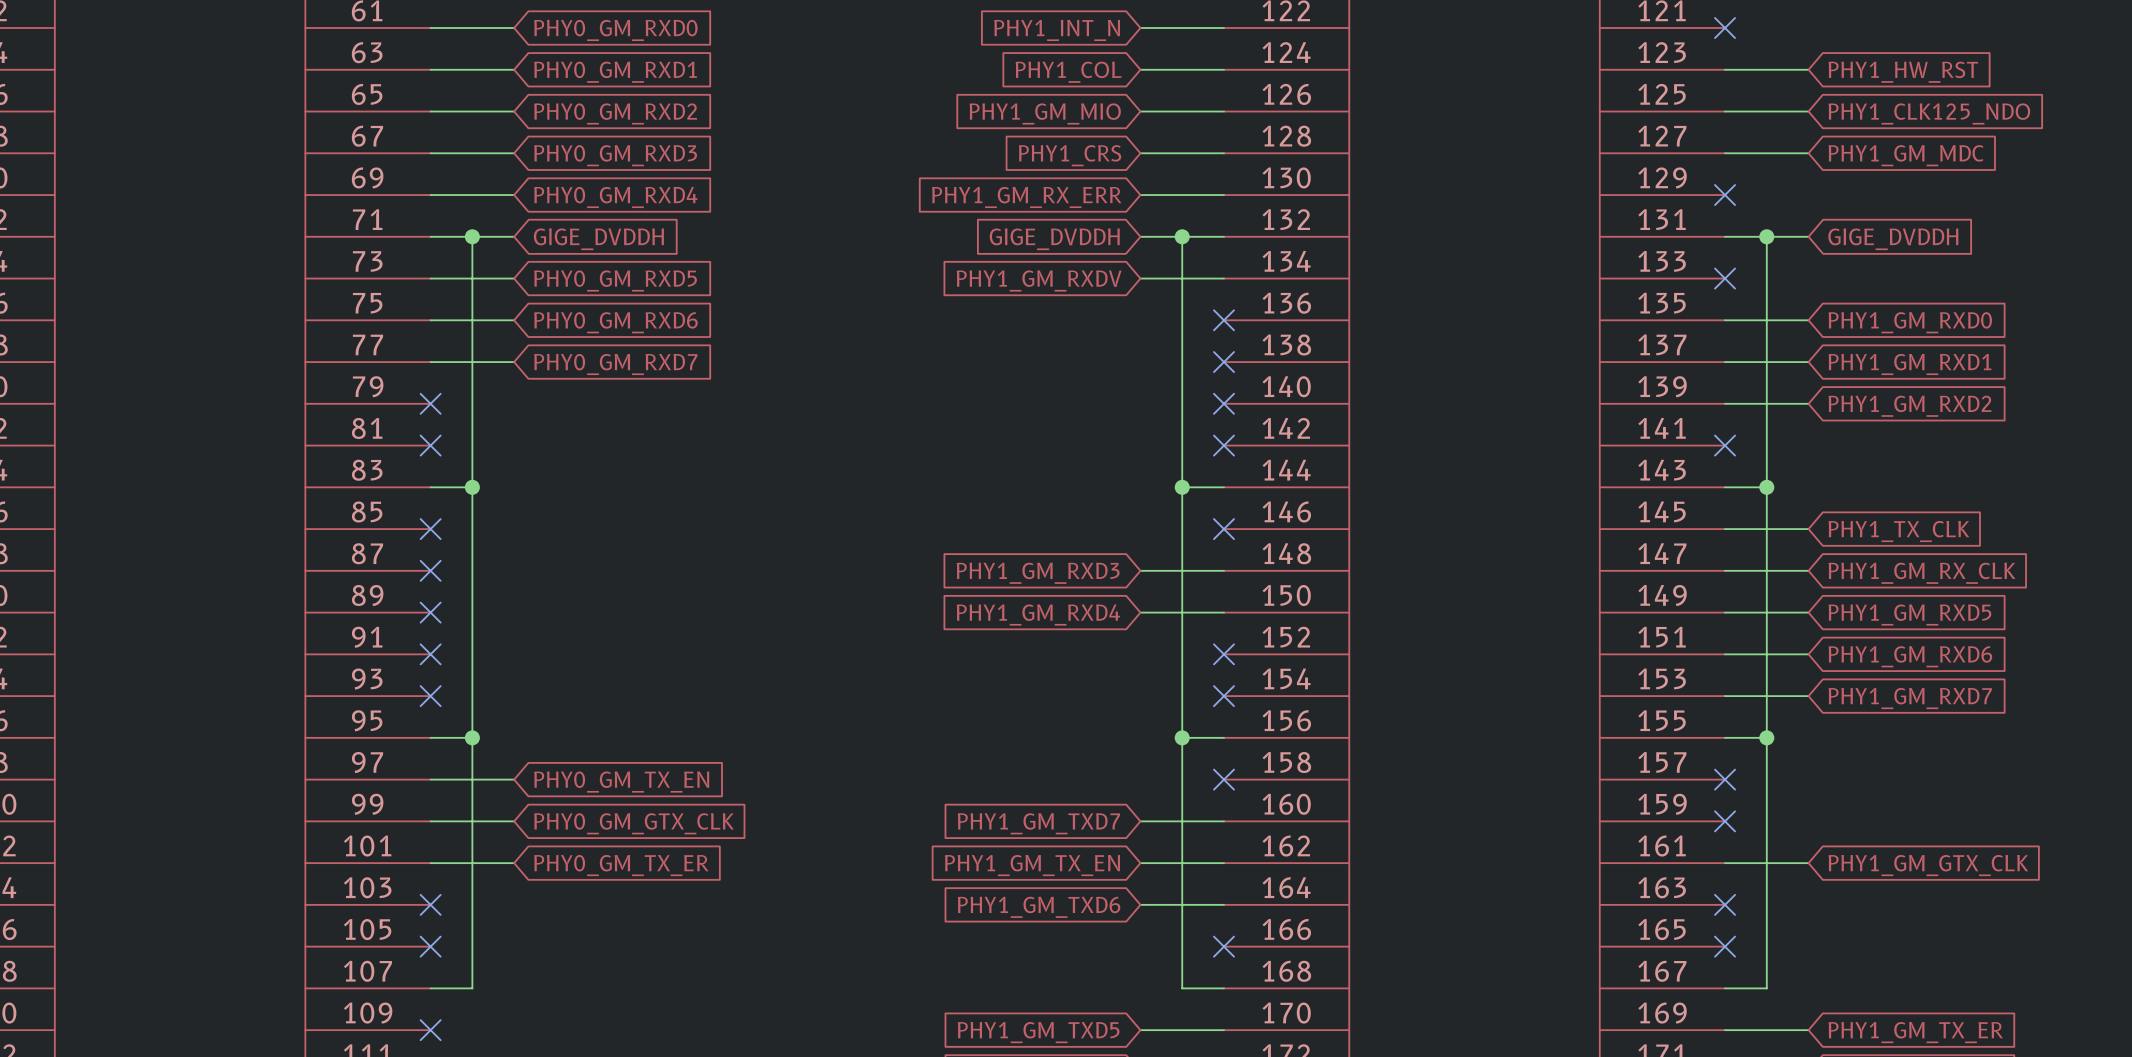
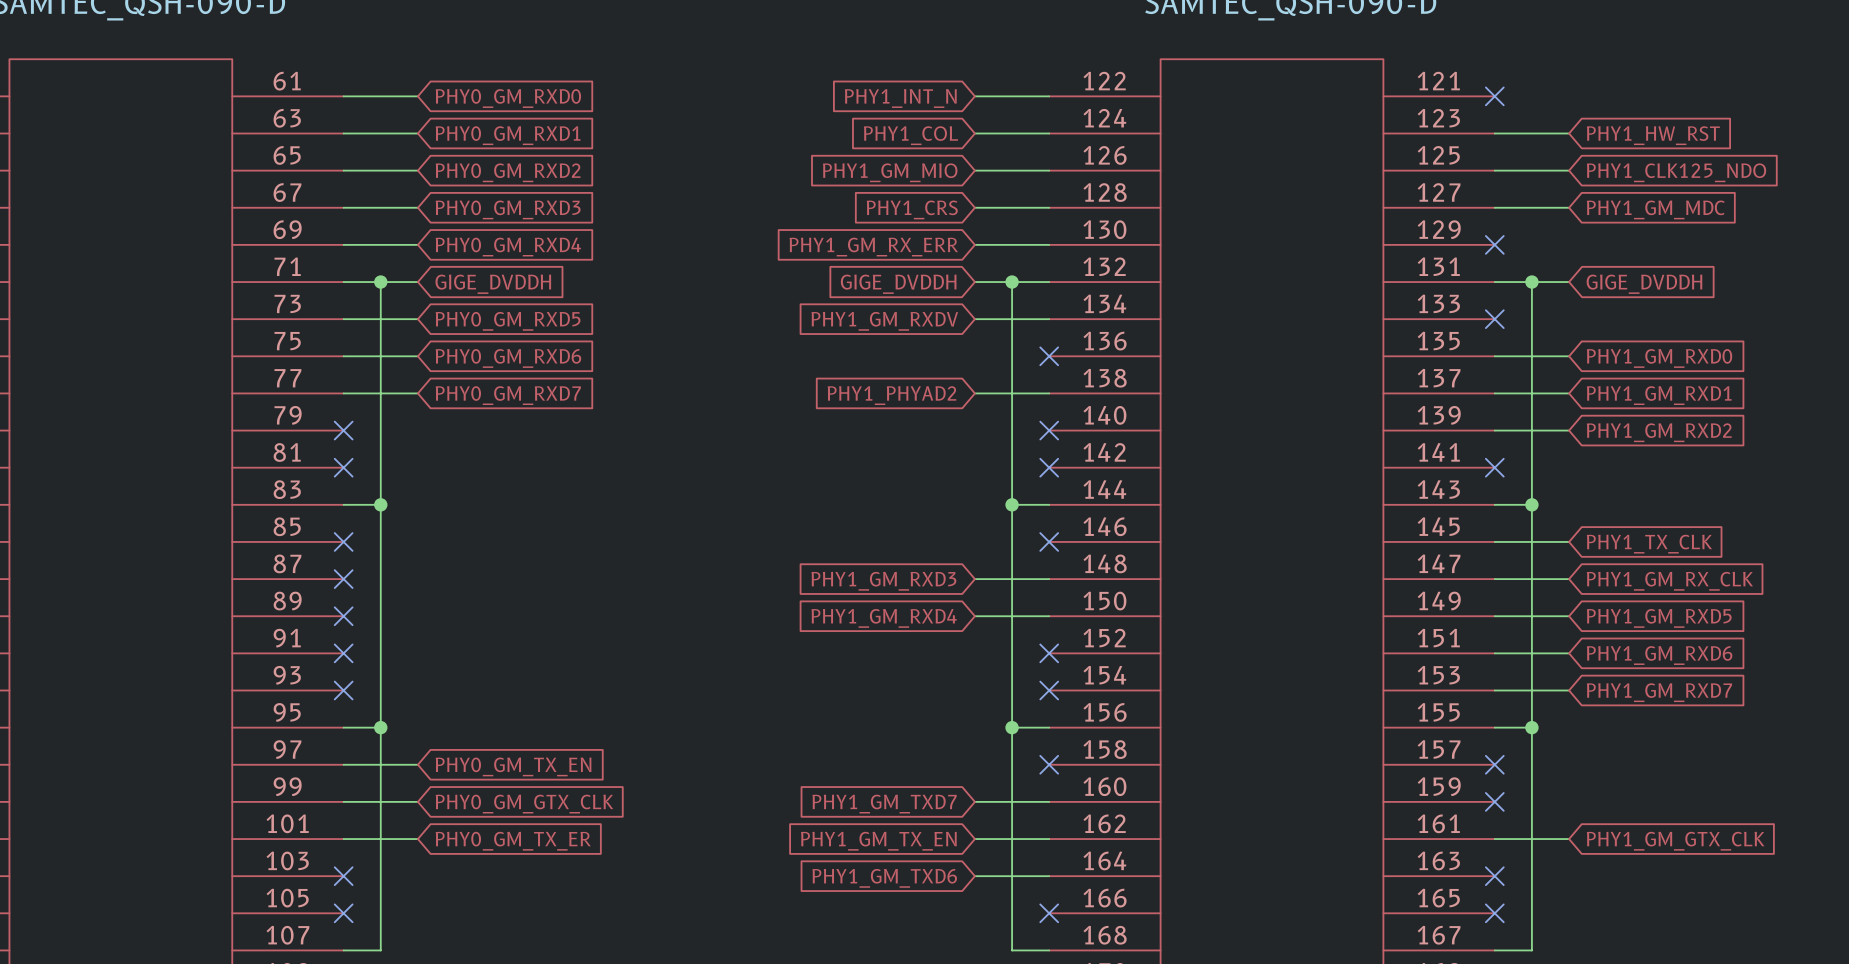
wire: none -> (974, 393) (1049, 393)
no-connect mark: (1223, 362) -> none
global label: none -> PHY1_PHYAD2 (891, 395)

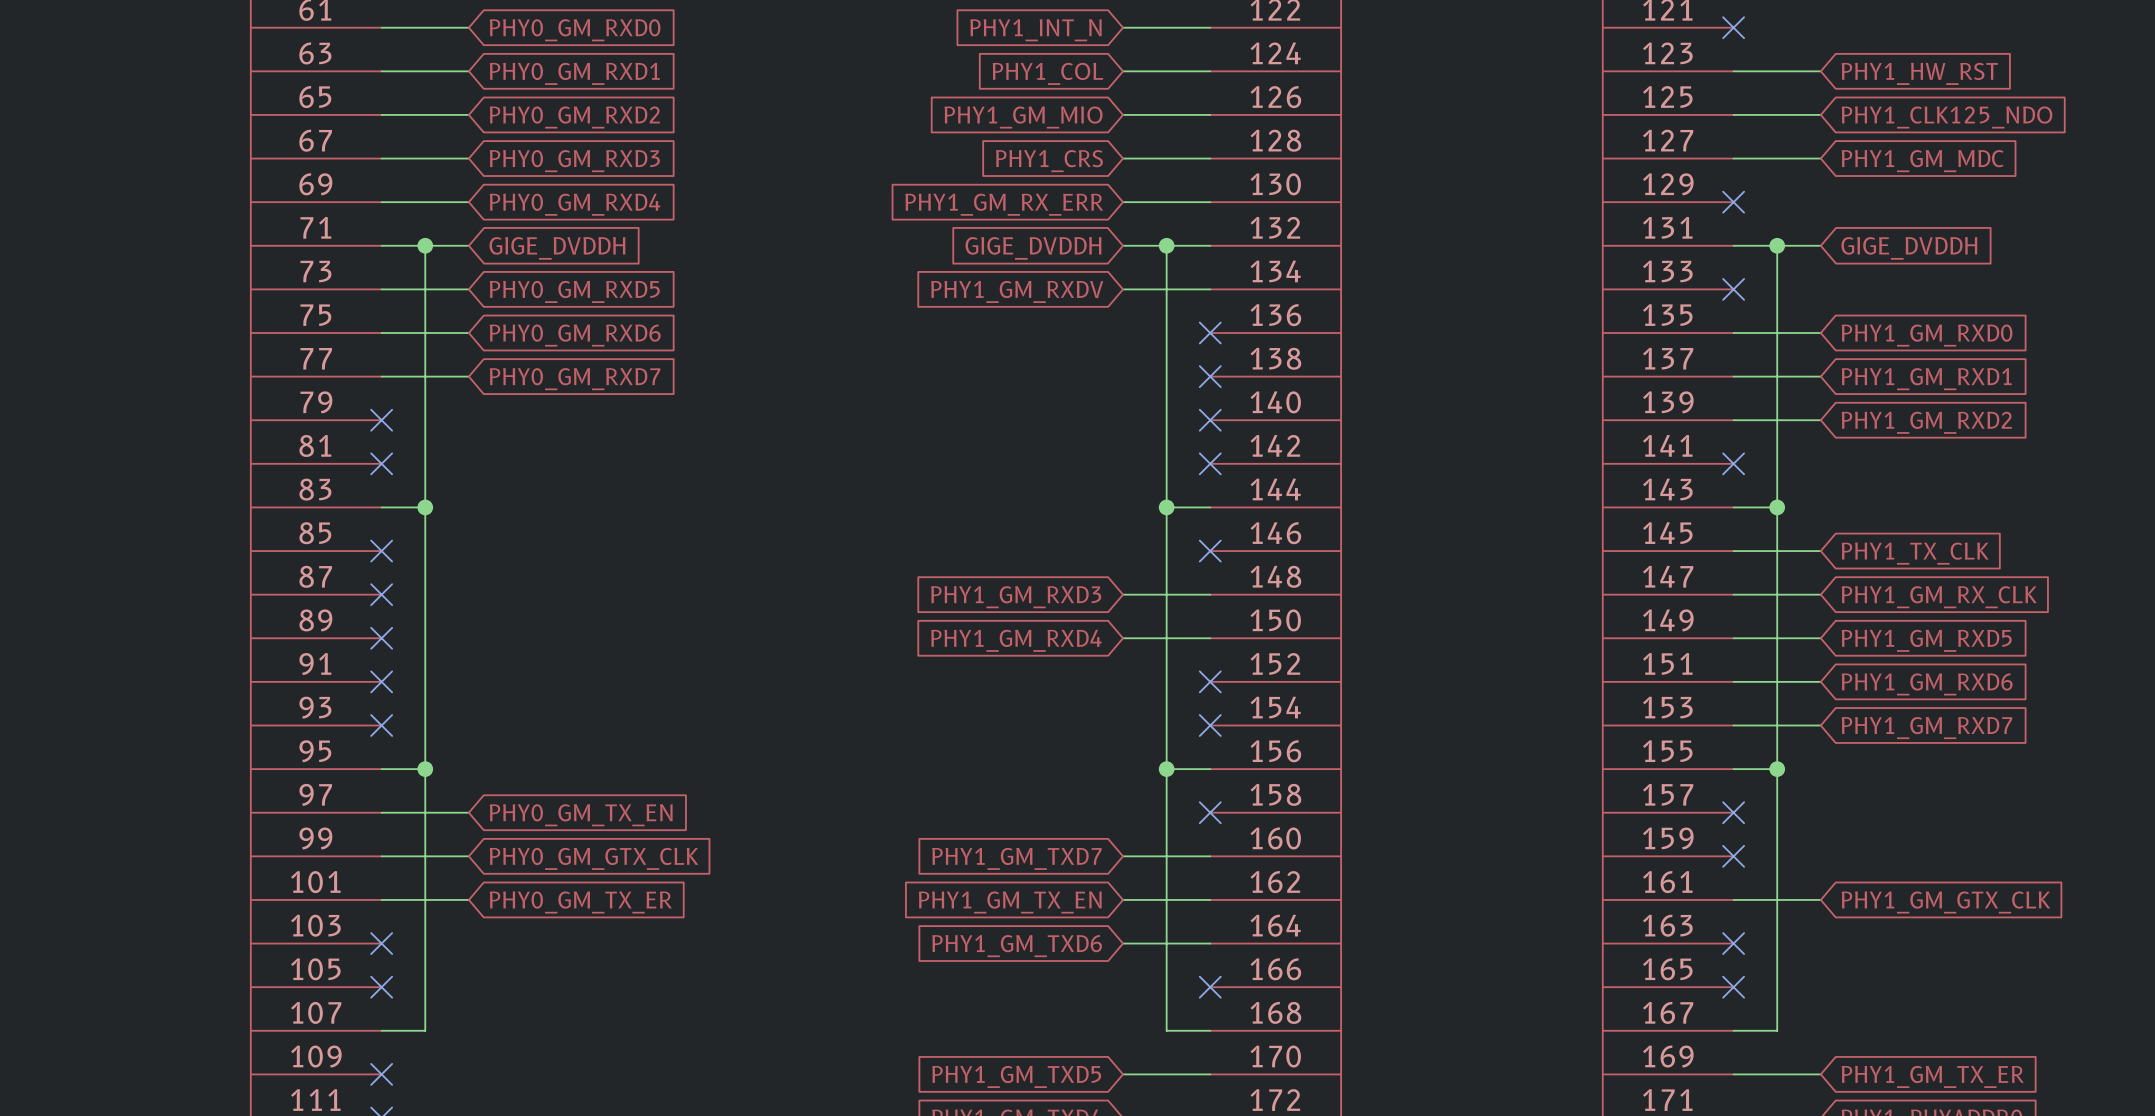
wire: (974, 393) (1049, 393) -> none
no-connect mark: none -> (1210, 376)
global label: PHY1_PHYAD2 (891, 395) -> none

